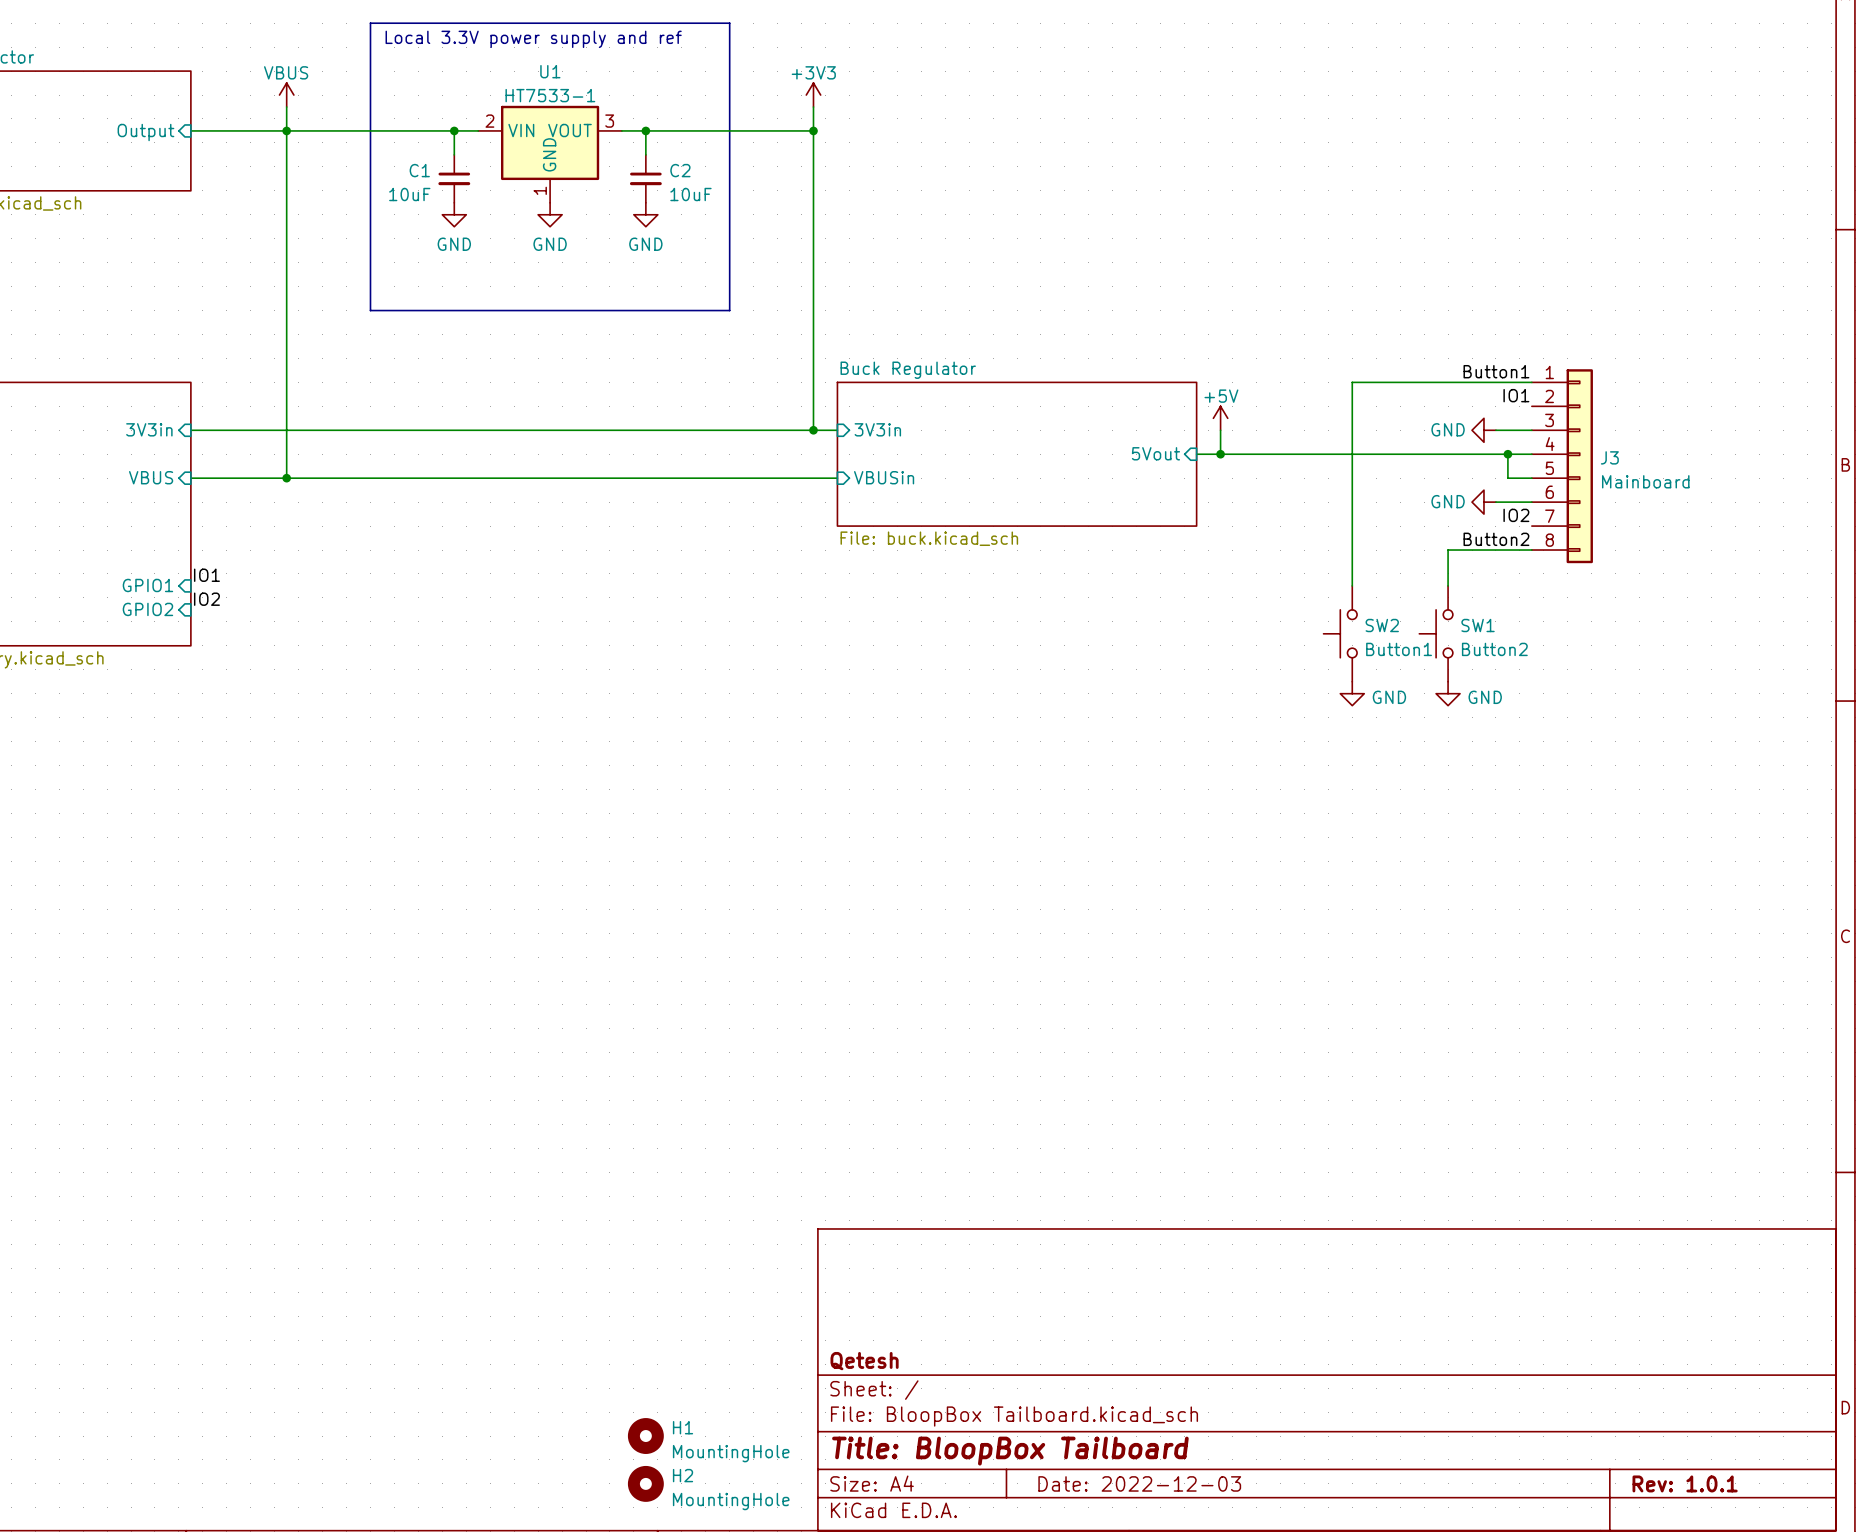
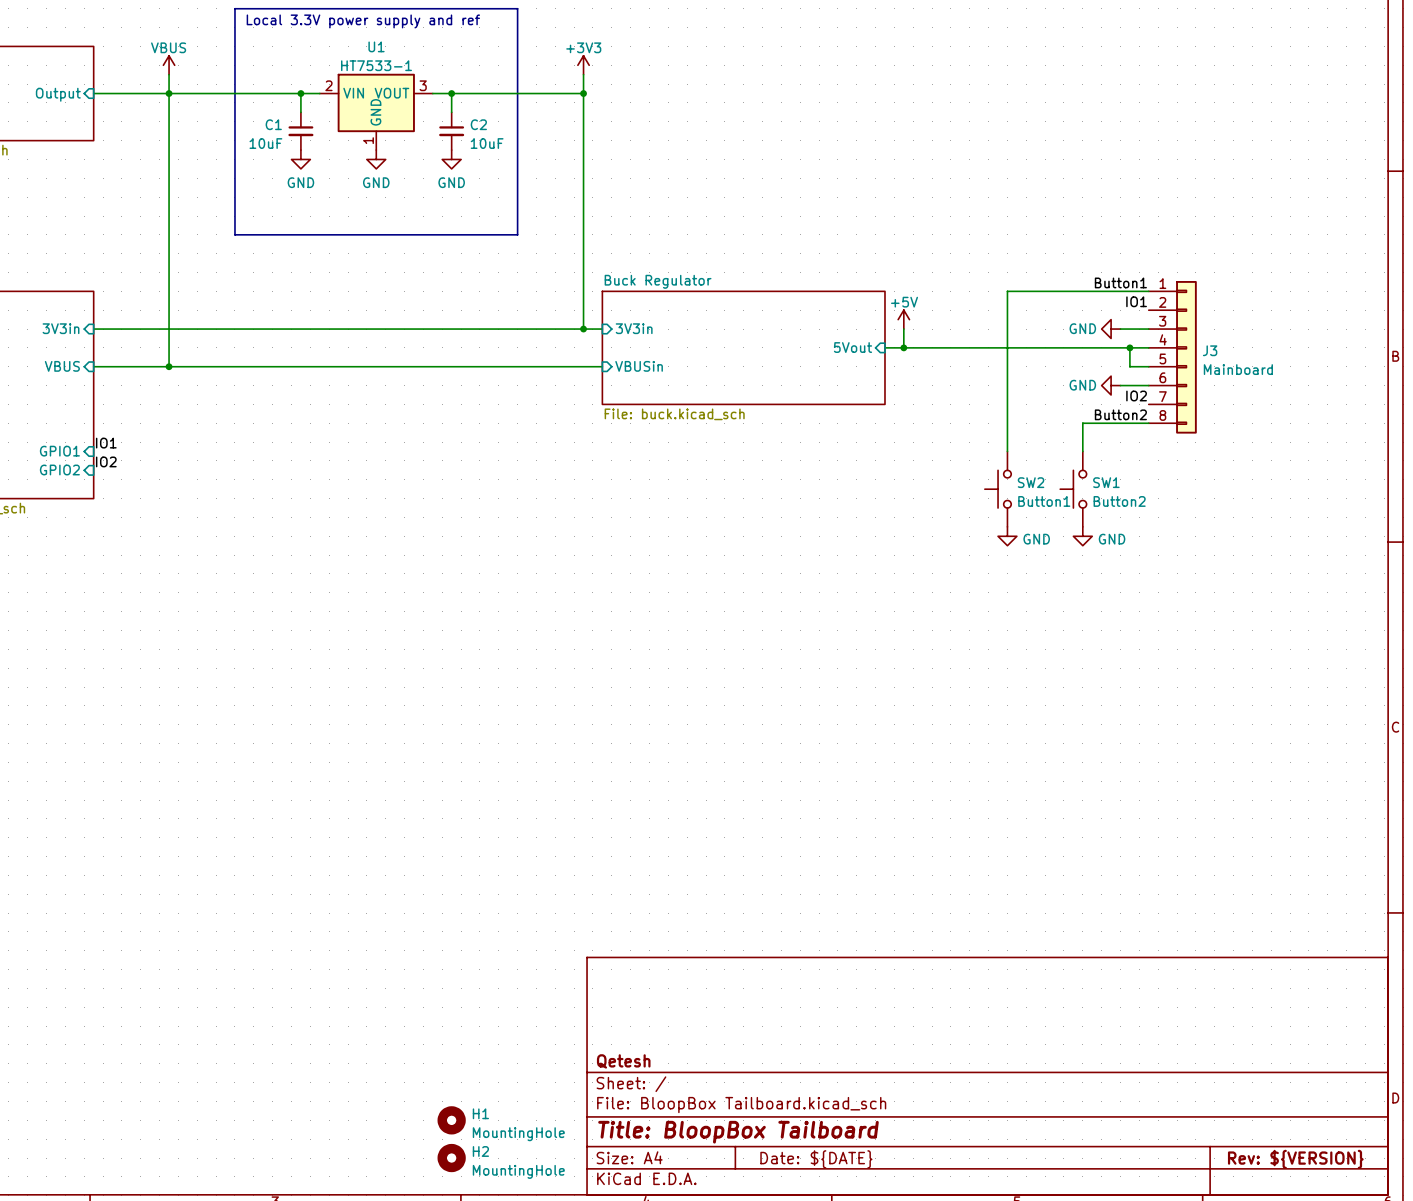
title block: Date: 2022-12-03 (1139, 1483) -> Date: ${DATE} (816, 1159)
title block: Rev: 1.0.1 (1685, 1483) -> Rev: ${VERSION} (1295, 1159)

